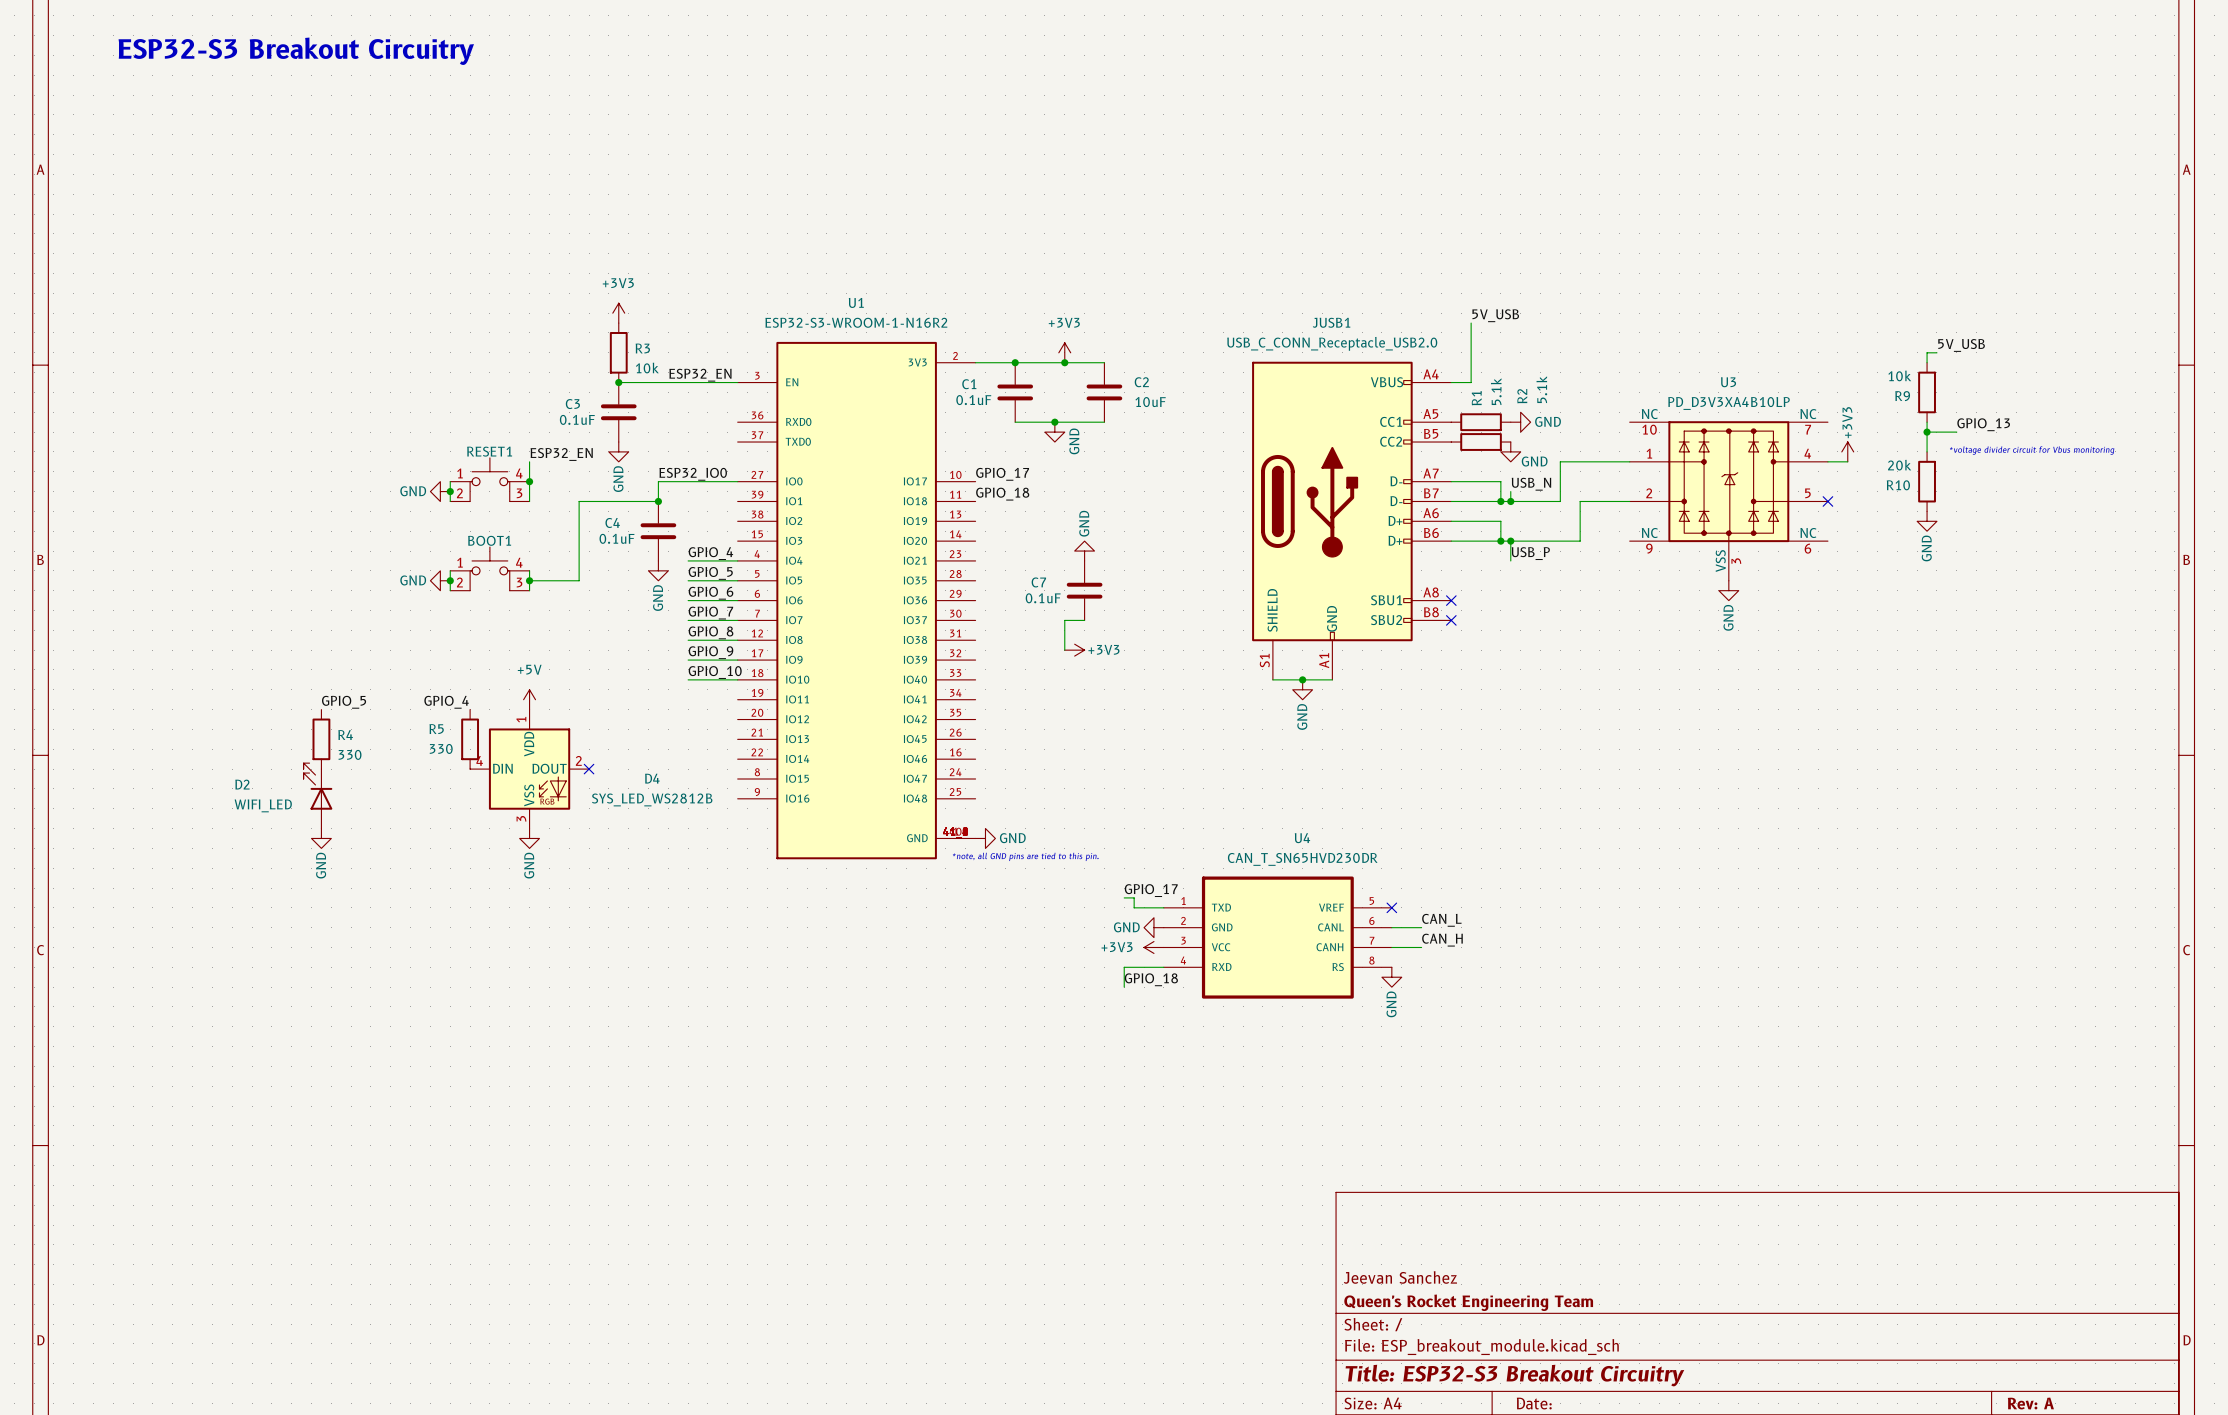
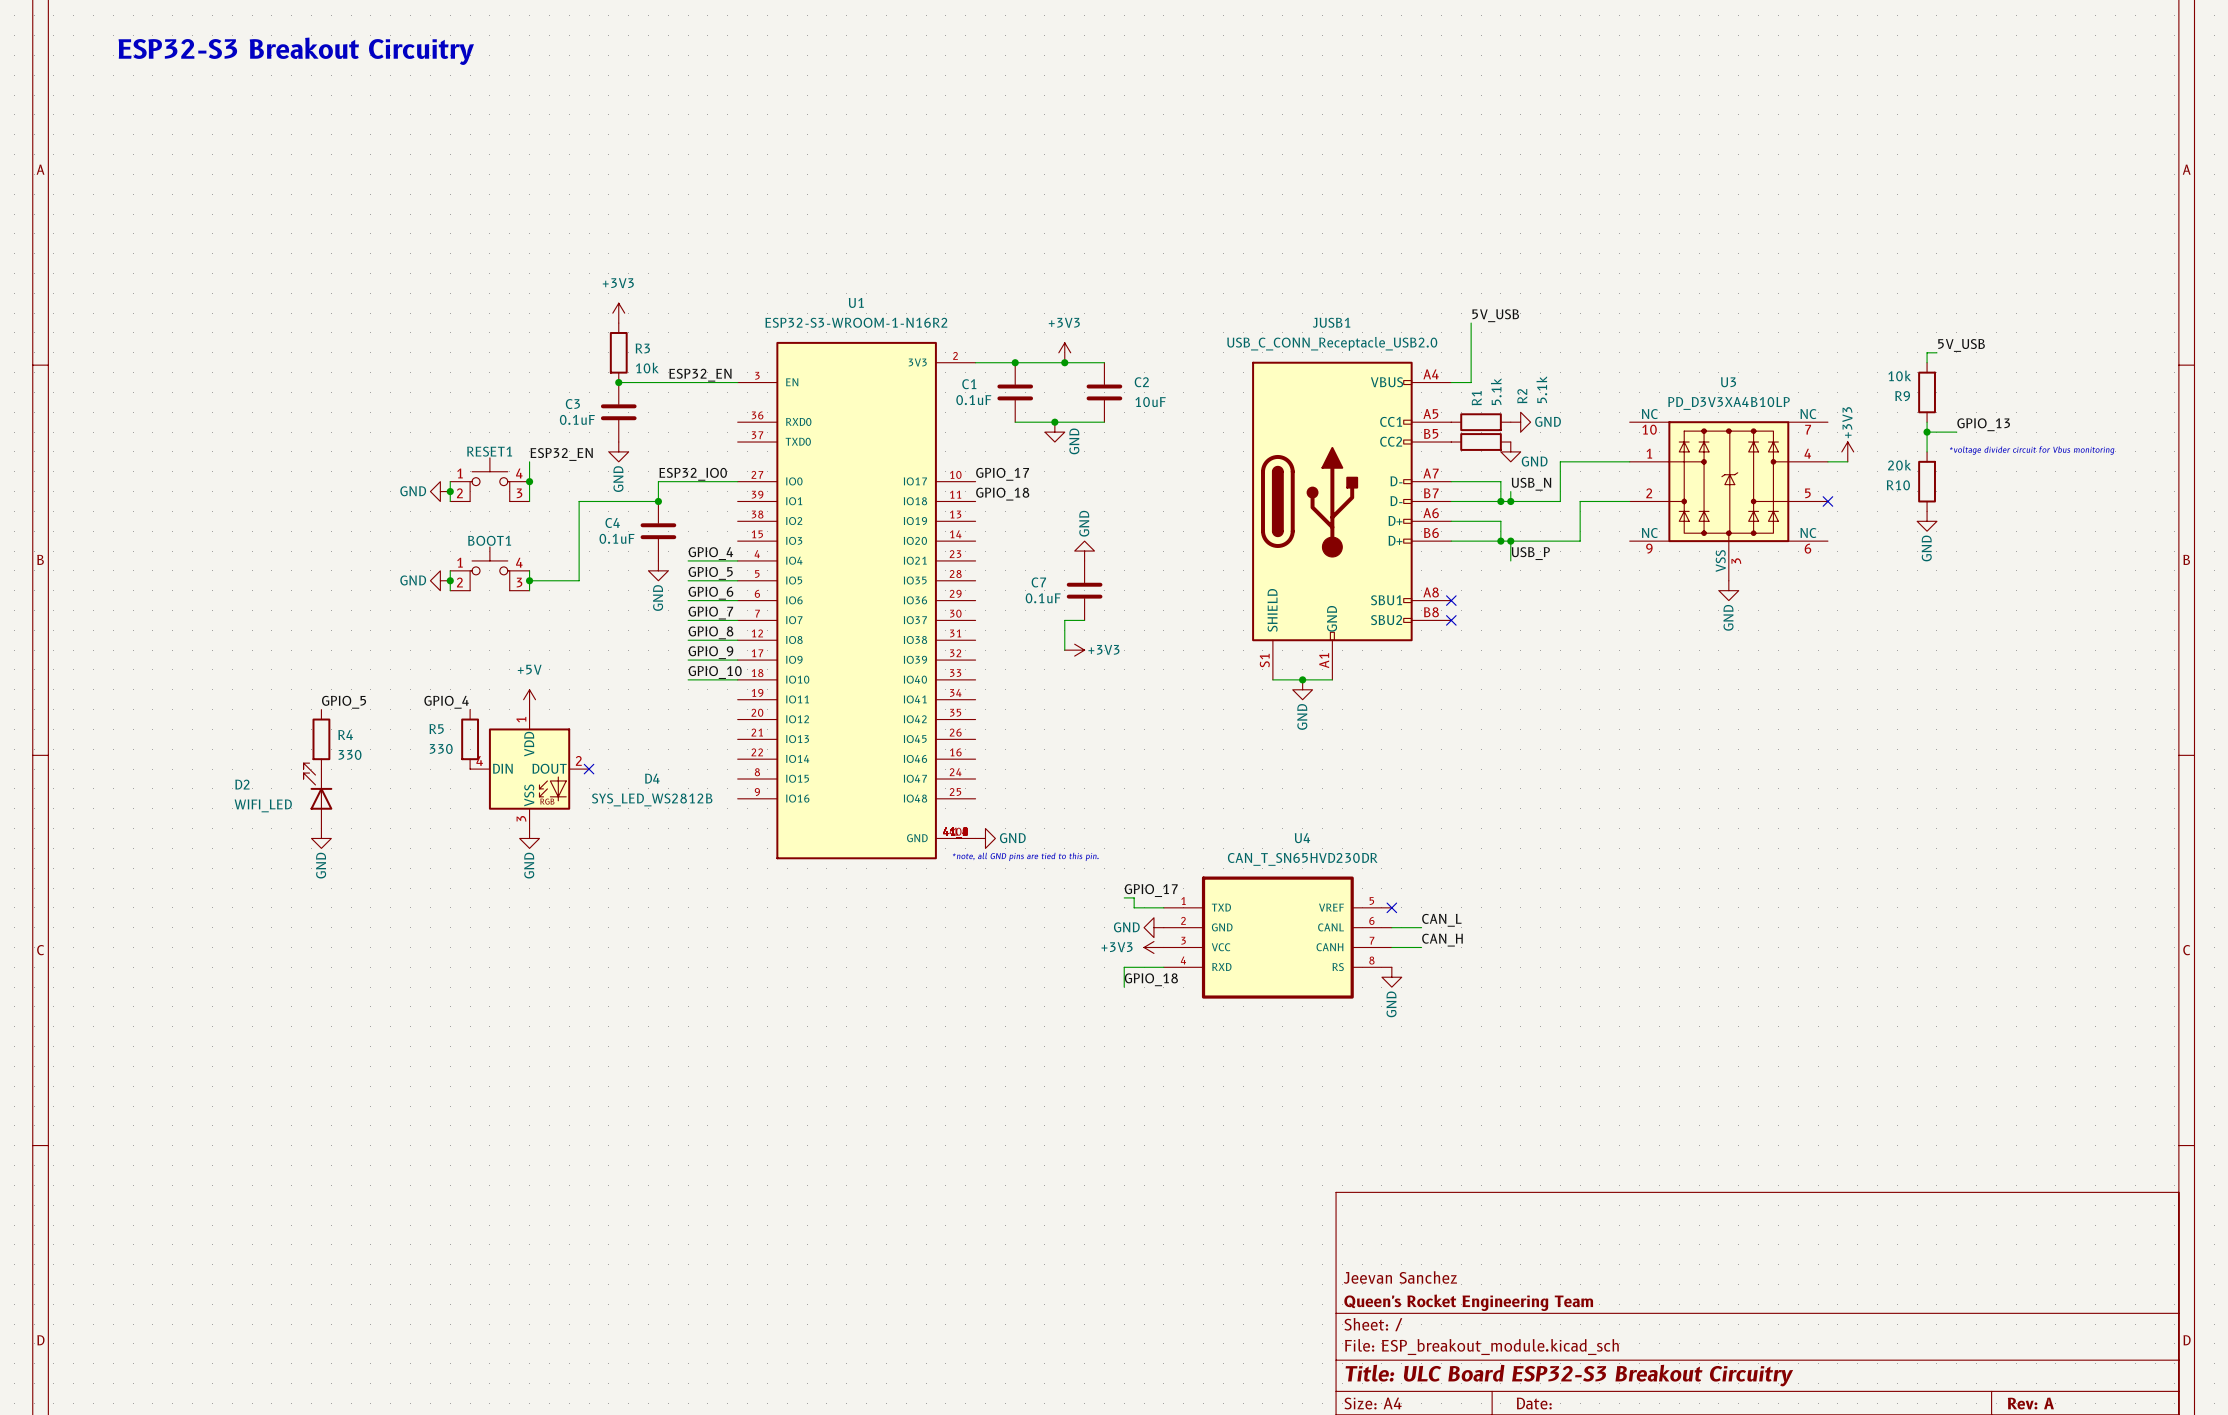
title block: Title: ESP32-S3 Breakout Circuitry (1514, 1375) -> Title: ULC Board ESP32-S3 Breakout Circuitry (1569, 1375)

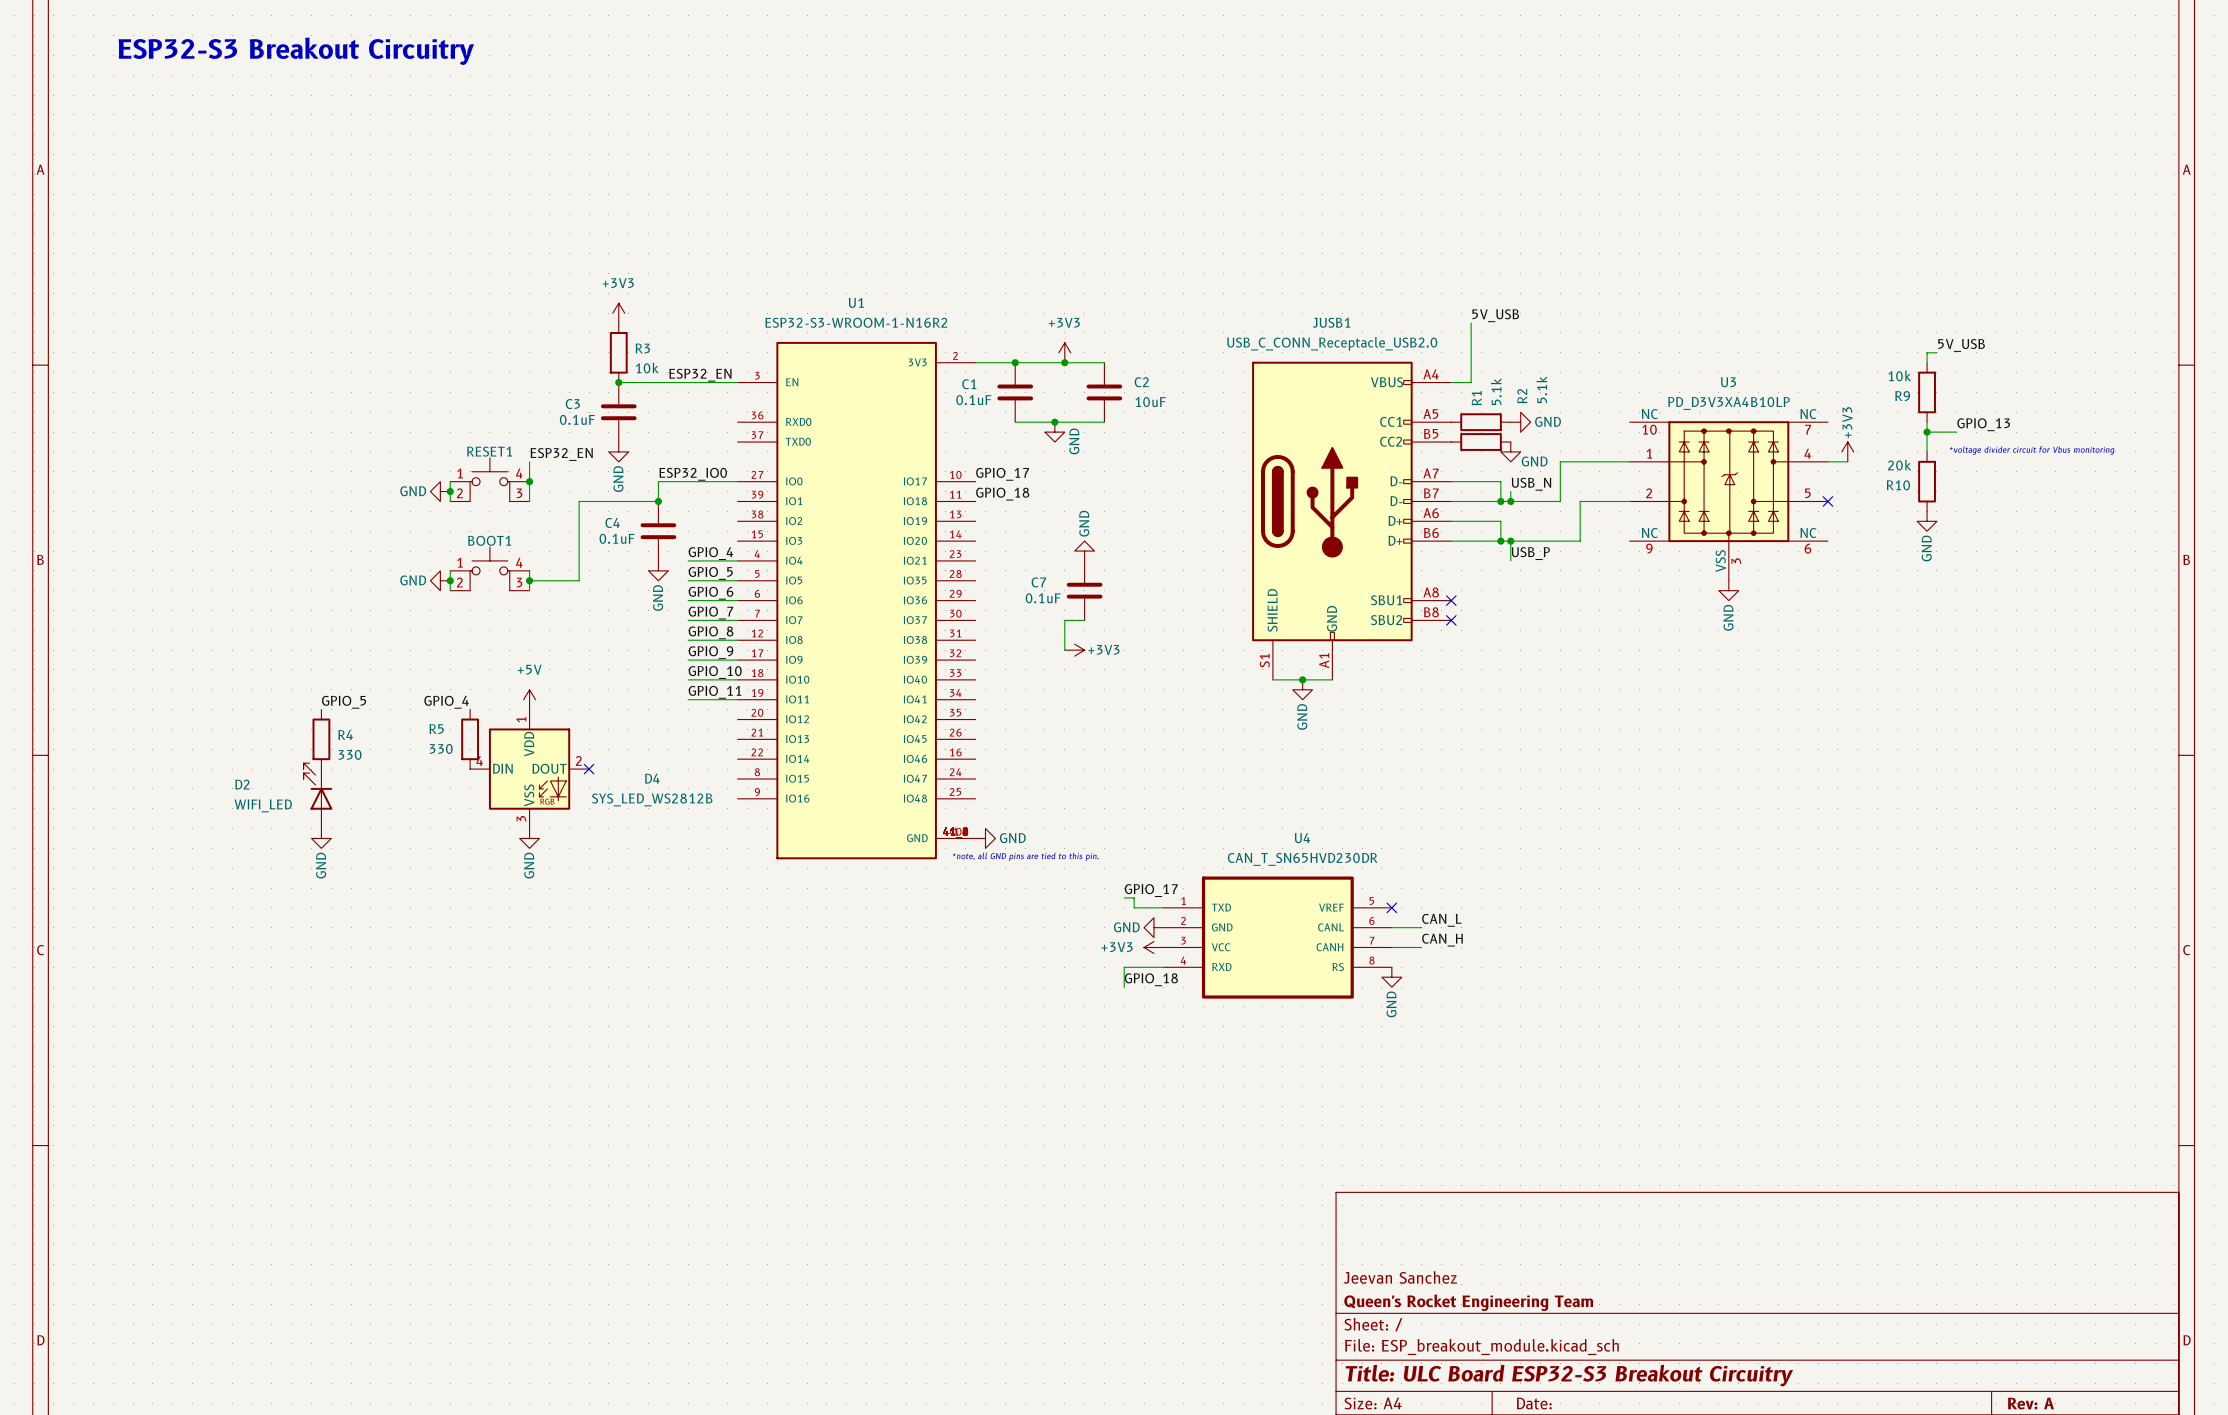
label: none -> GPIO_11 (715, 692)
wire: none -> (688, 699) (737, 699)

